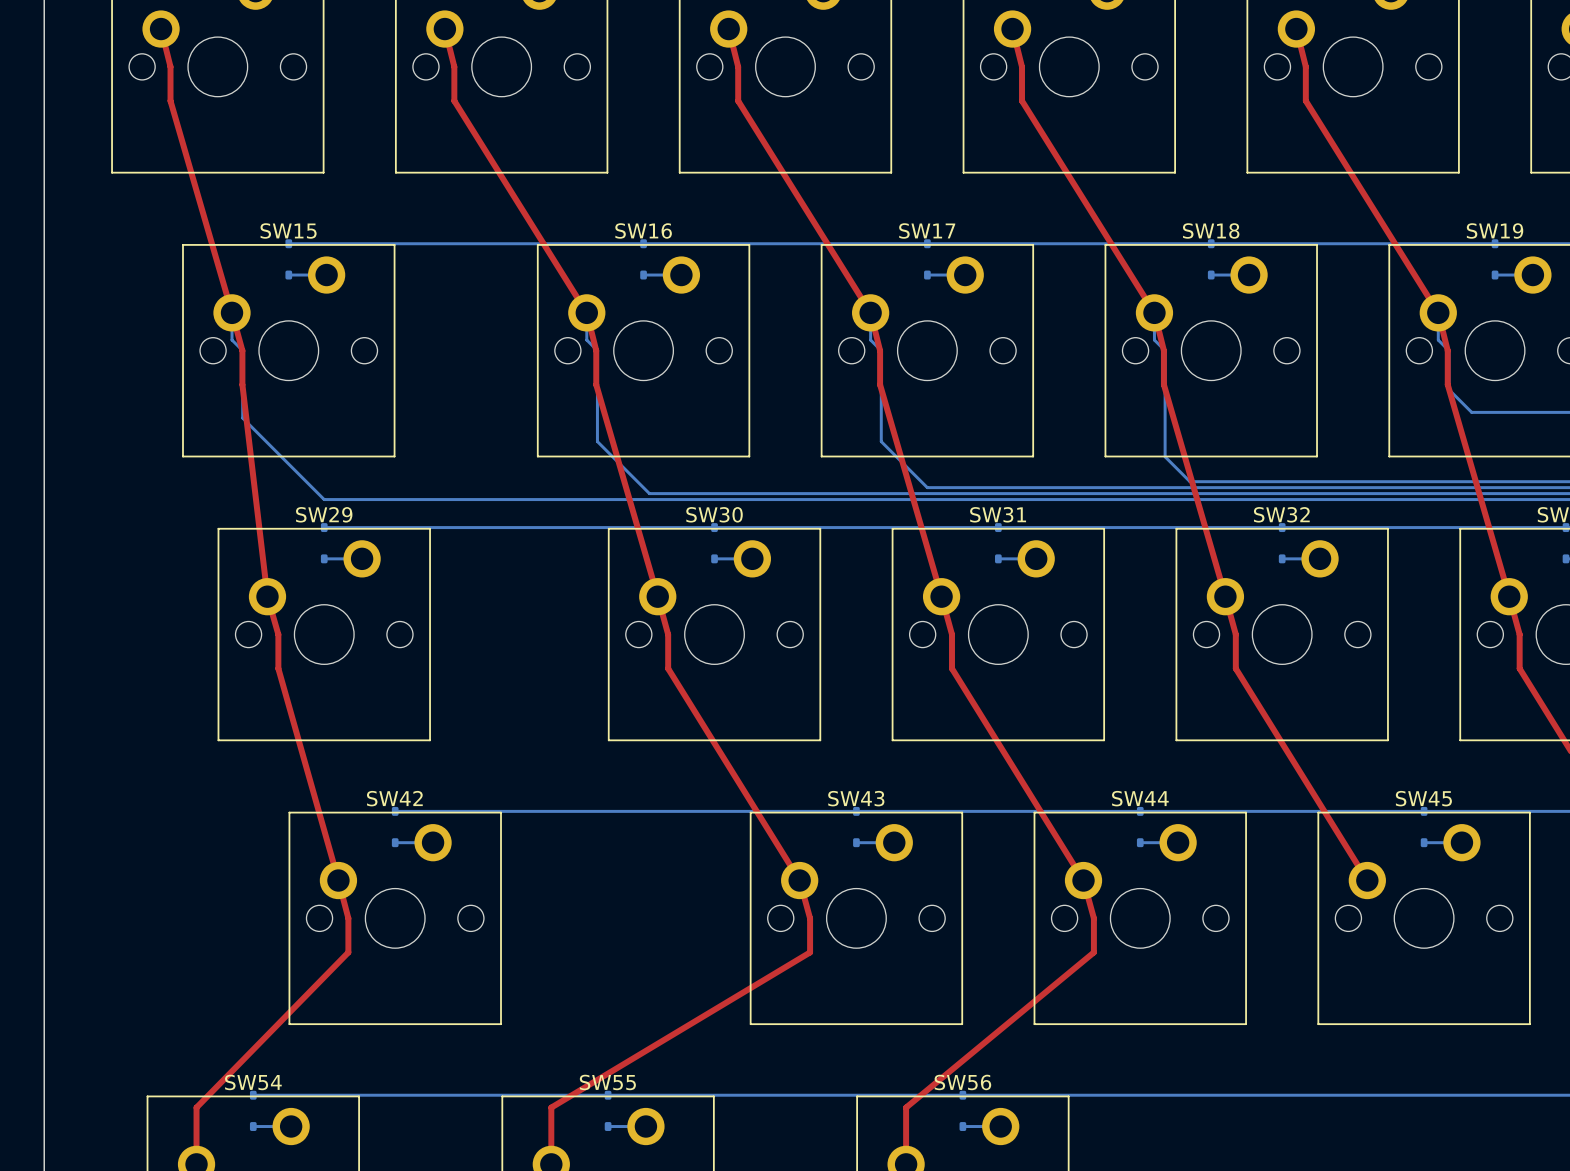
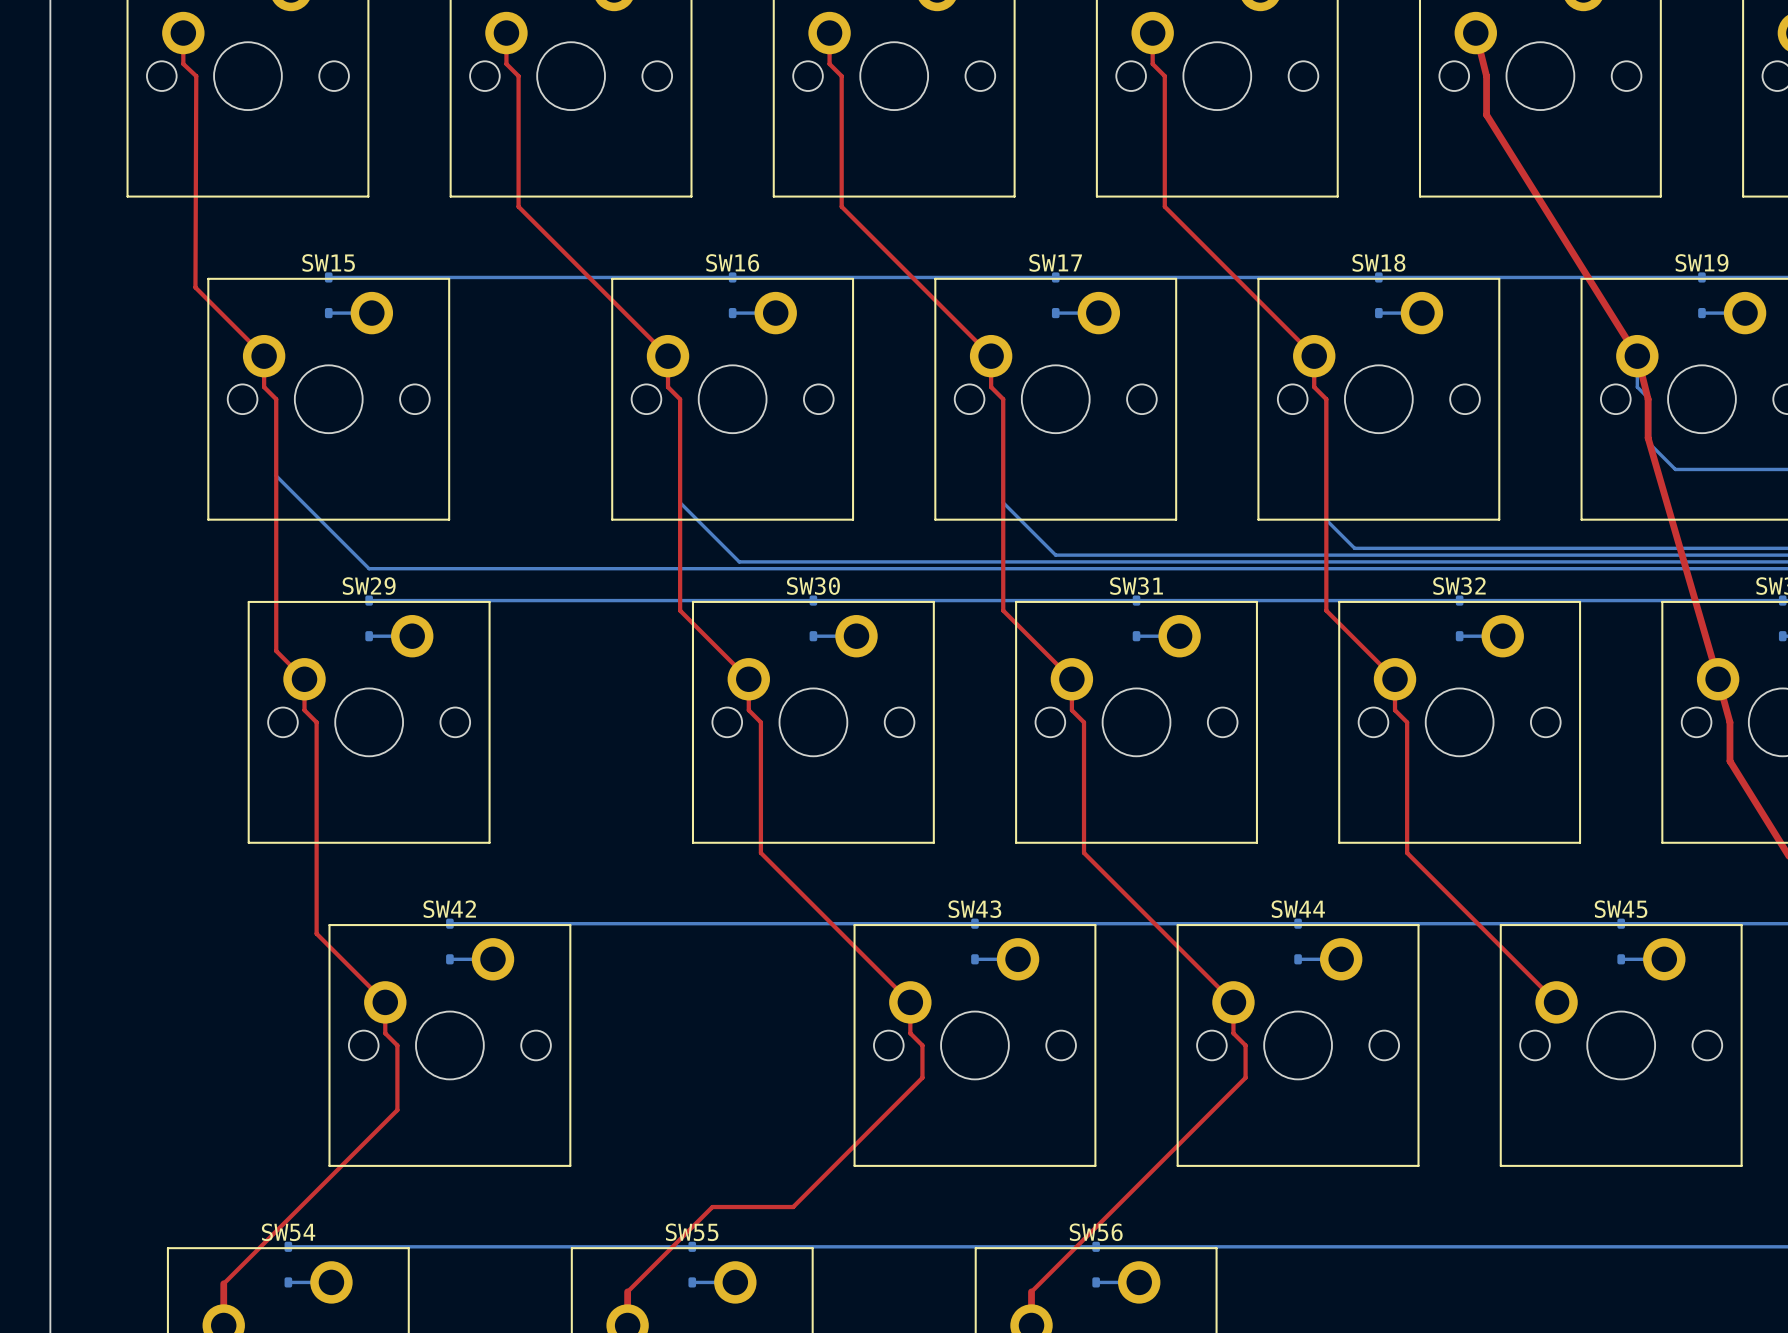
top track: (161, 29) (170, 66) (170, 100) (242, 350) (242, 384) (267, 596) (278, 634) (278, 668) (348, 918) (348, 952) (196, 1107) (196, 1127) -> (183, 33) (183, 64) (196, 76) (195, 287) (264, 356) (264, 387) (276, 399) (276, 651) (304, 679) (304, 710) (316, 722) (316, 933) (385, 1002) (385, 1033) (397, 1045) (397, 1110) (223, 1283)
top track: (444, 29) (454, 66) (454, 100) (586, 312) (596, 350) (596, 384) (668, 634) (668, 668) (799, 880) (810, 918) (810, 952) (551, 1107) (551, 1134) -> (506, 33) (506, 64) (518, 76) (518, 206) (668, 356) (668, 387) (680, 399) (680, 610) (748, 679) (748, 710) (760, 722) (760, 852) (910, 1002) (910, 1033) (922, 1045) (922, 1077) (793, 1207) (712, 1207) (627, 1291)
top track: (728, 29) (738, 66) (738, 100) (870, 312) (880, 350) (880, 384) (952, 634) (952, 668) (1083, 880) (1093, 918) (1093, 952) (906, 1107) (906, 1134) -> (829, 33) (829, 64) (841, 76) (841, 206) (991, 356) (991, 387) (1003, 399) (1003, 610) (1071, 679) (1071, 710) (1084, 722) (1084, 852) (1233, 1002) (1233, 1033) (1245, 1045) (1245, 1077) (1031, 1291)
top track: (1012, 29) (1022, 66) (1022, 100) (1154, 312) (1163, 350) (1163, 384) (1235, 634) (1235, 668) (1367, 880) -> (1152, 33) (1152, 64) (1164, 76) (1164, 206) (1314, 356) (1314, 387) (1326, 399) (1326, 610) (1395, 679) (1395, 710) (1407, 722) (1407, 852) (1556, 1002)

